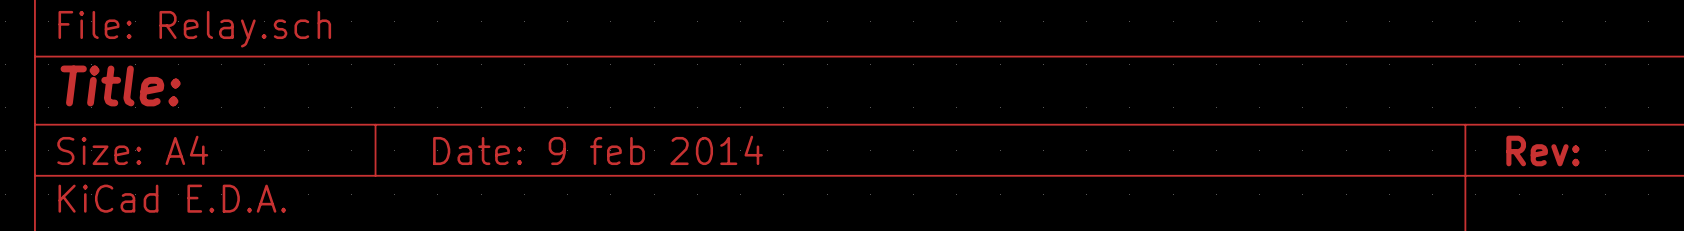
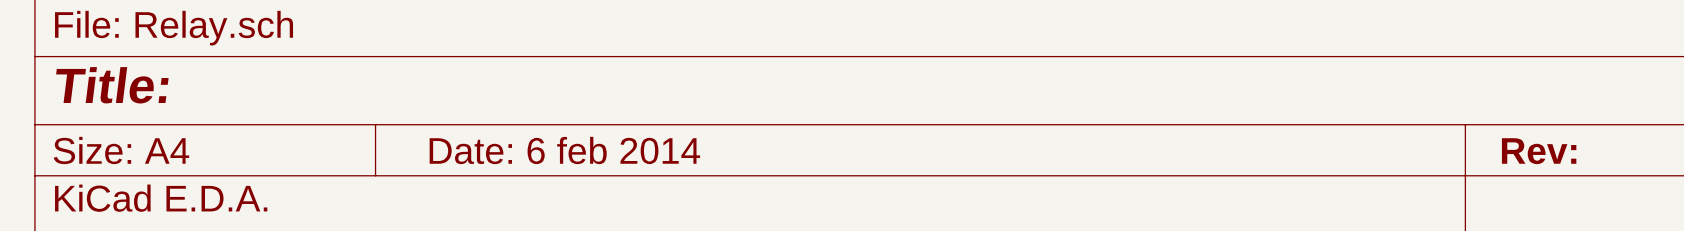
title block: Date: 9 feb 2014 (598, 150) -> Date: 6 feb 2014 (564, 150)

